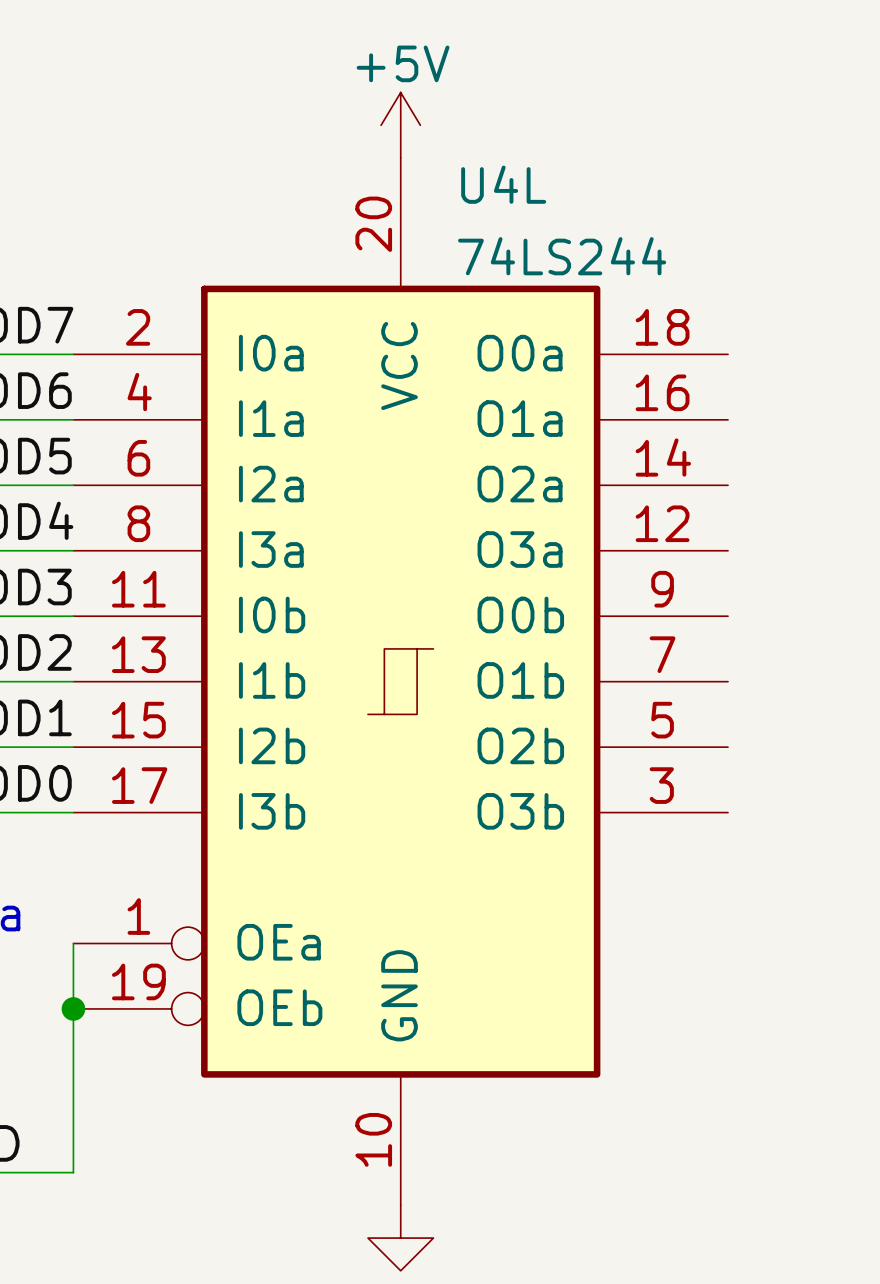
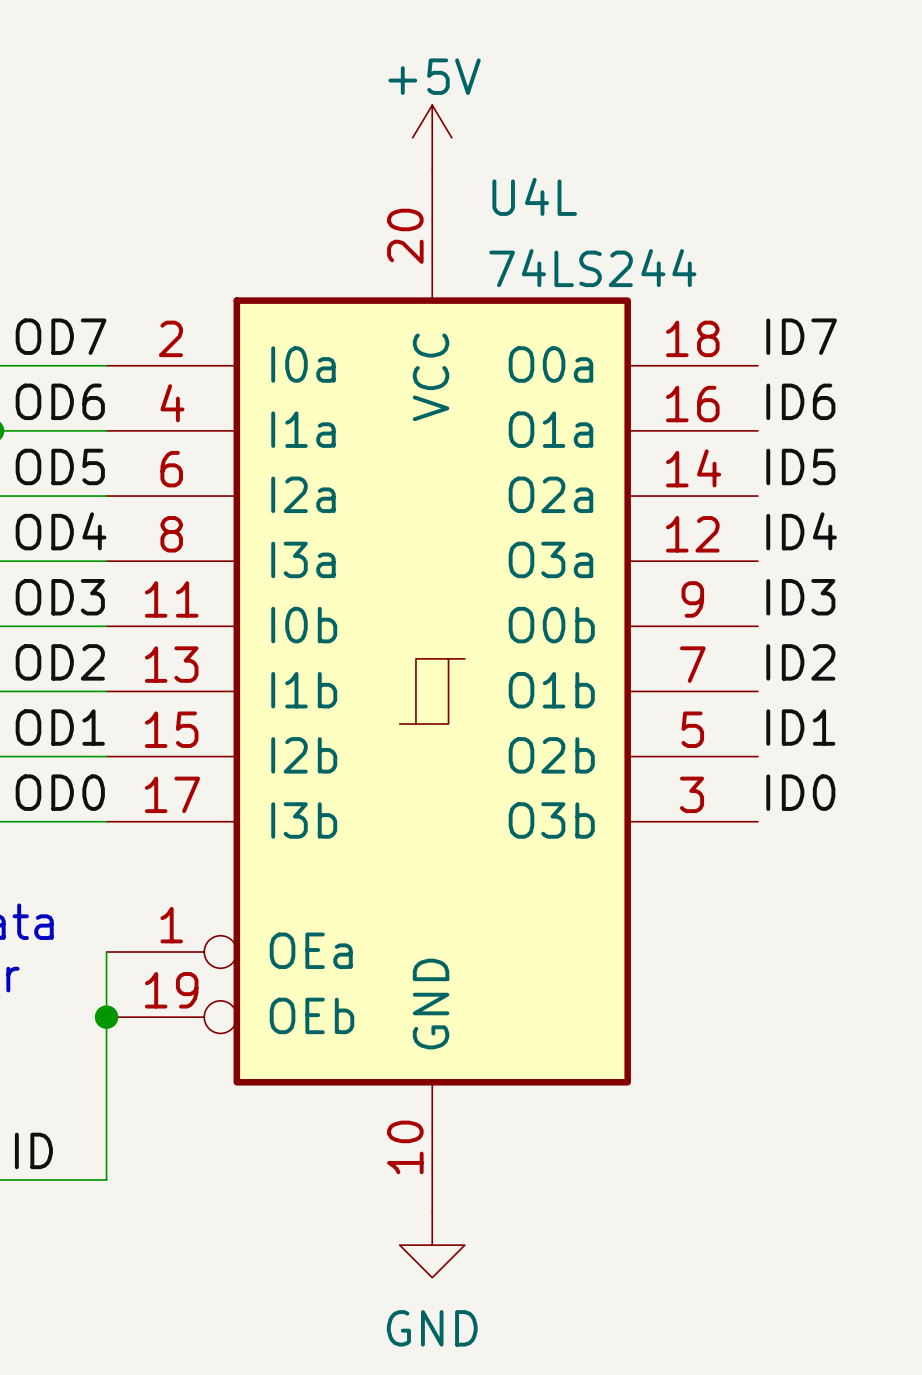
label: none -> ID7 (801, 336)
label: none -> ID6 (800, 401)
label: none -> ID5 (800, 466)
label: none -> ID4 (801, 531)
label: none -> ID3 (800, 597)
label: none -> ID2 (800, 662)
label: none -> ID1 (800, 727)
label: none -> ID0 (800, 792)

